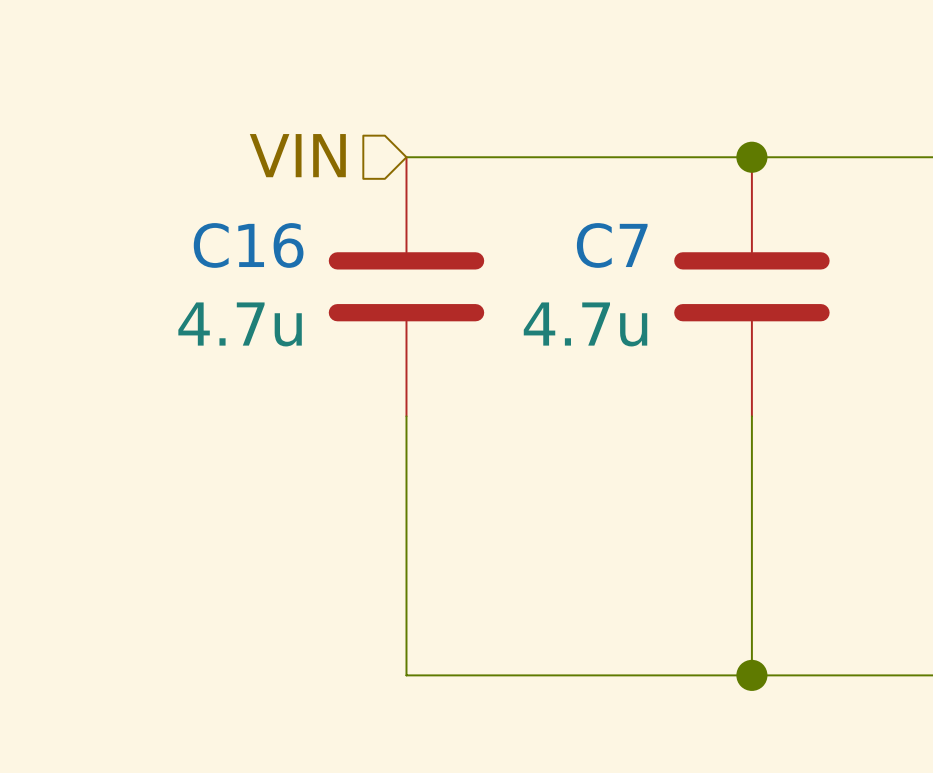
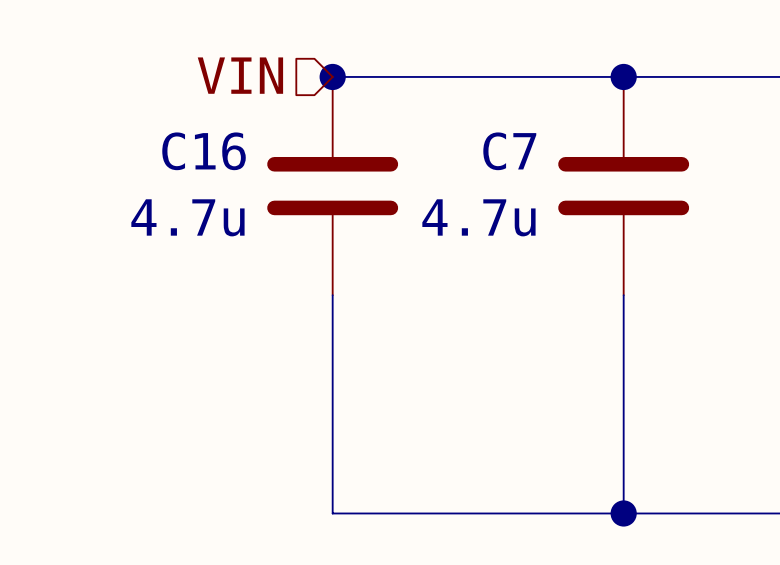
junction: none -> (332, 76)

